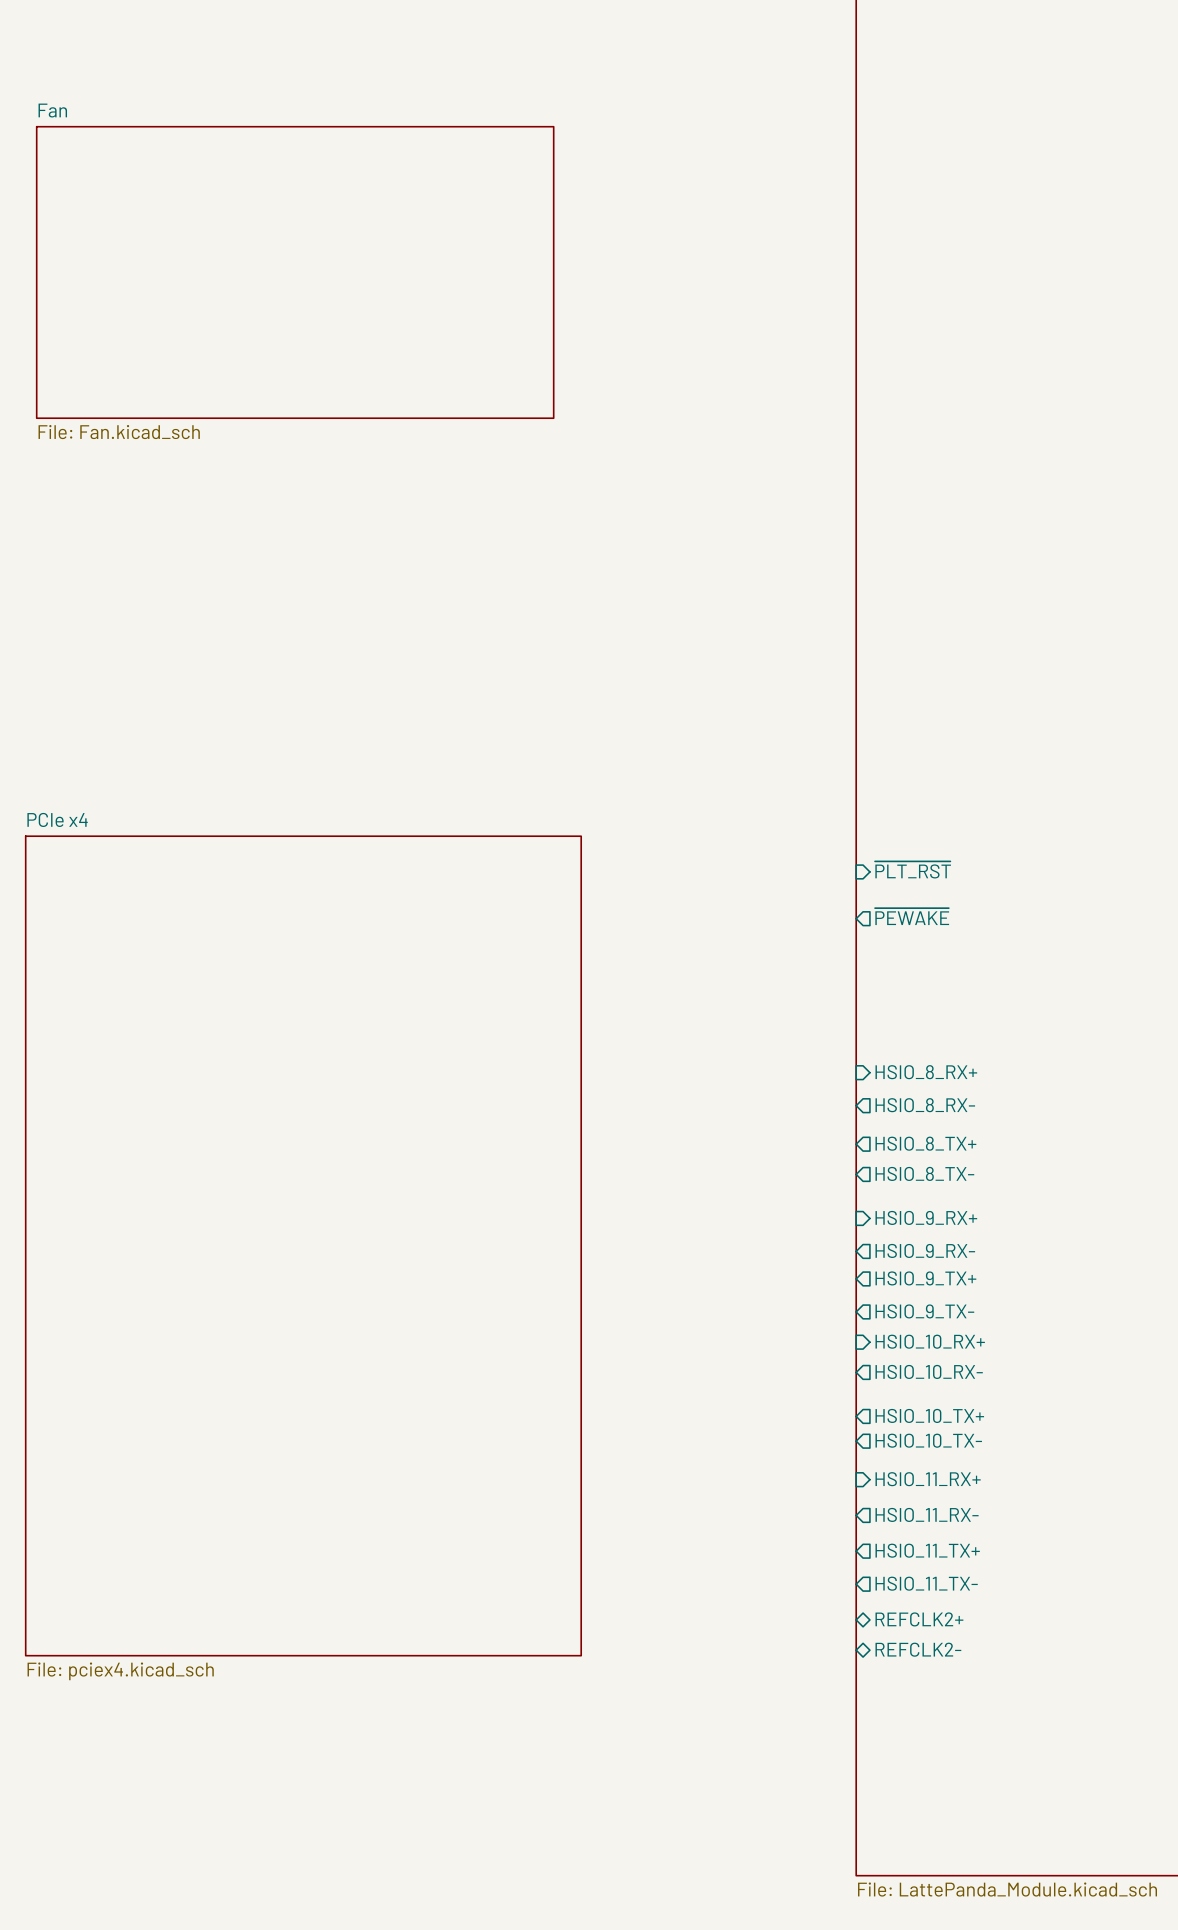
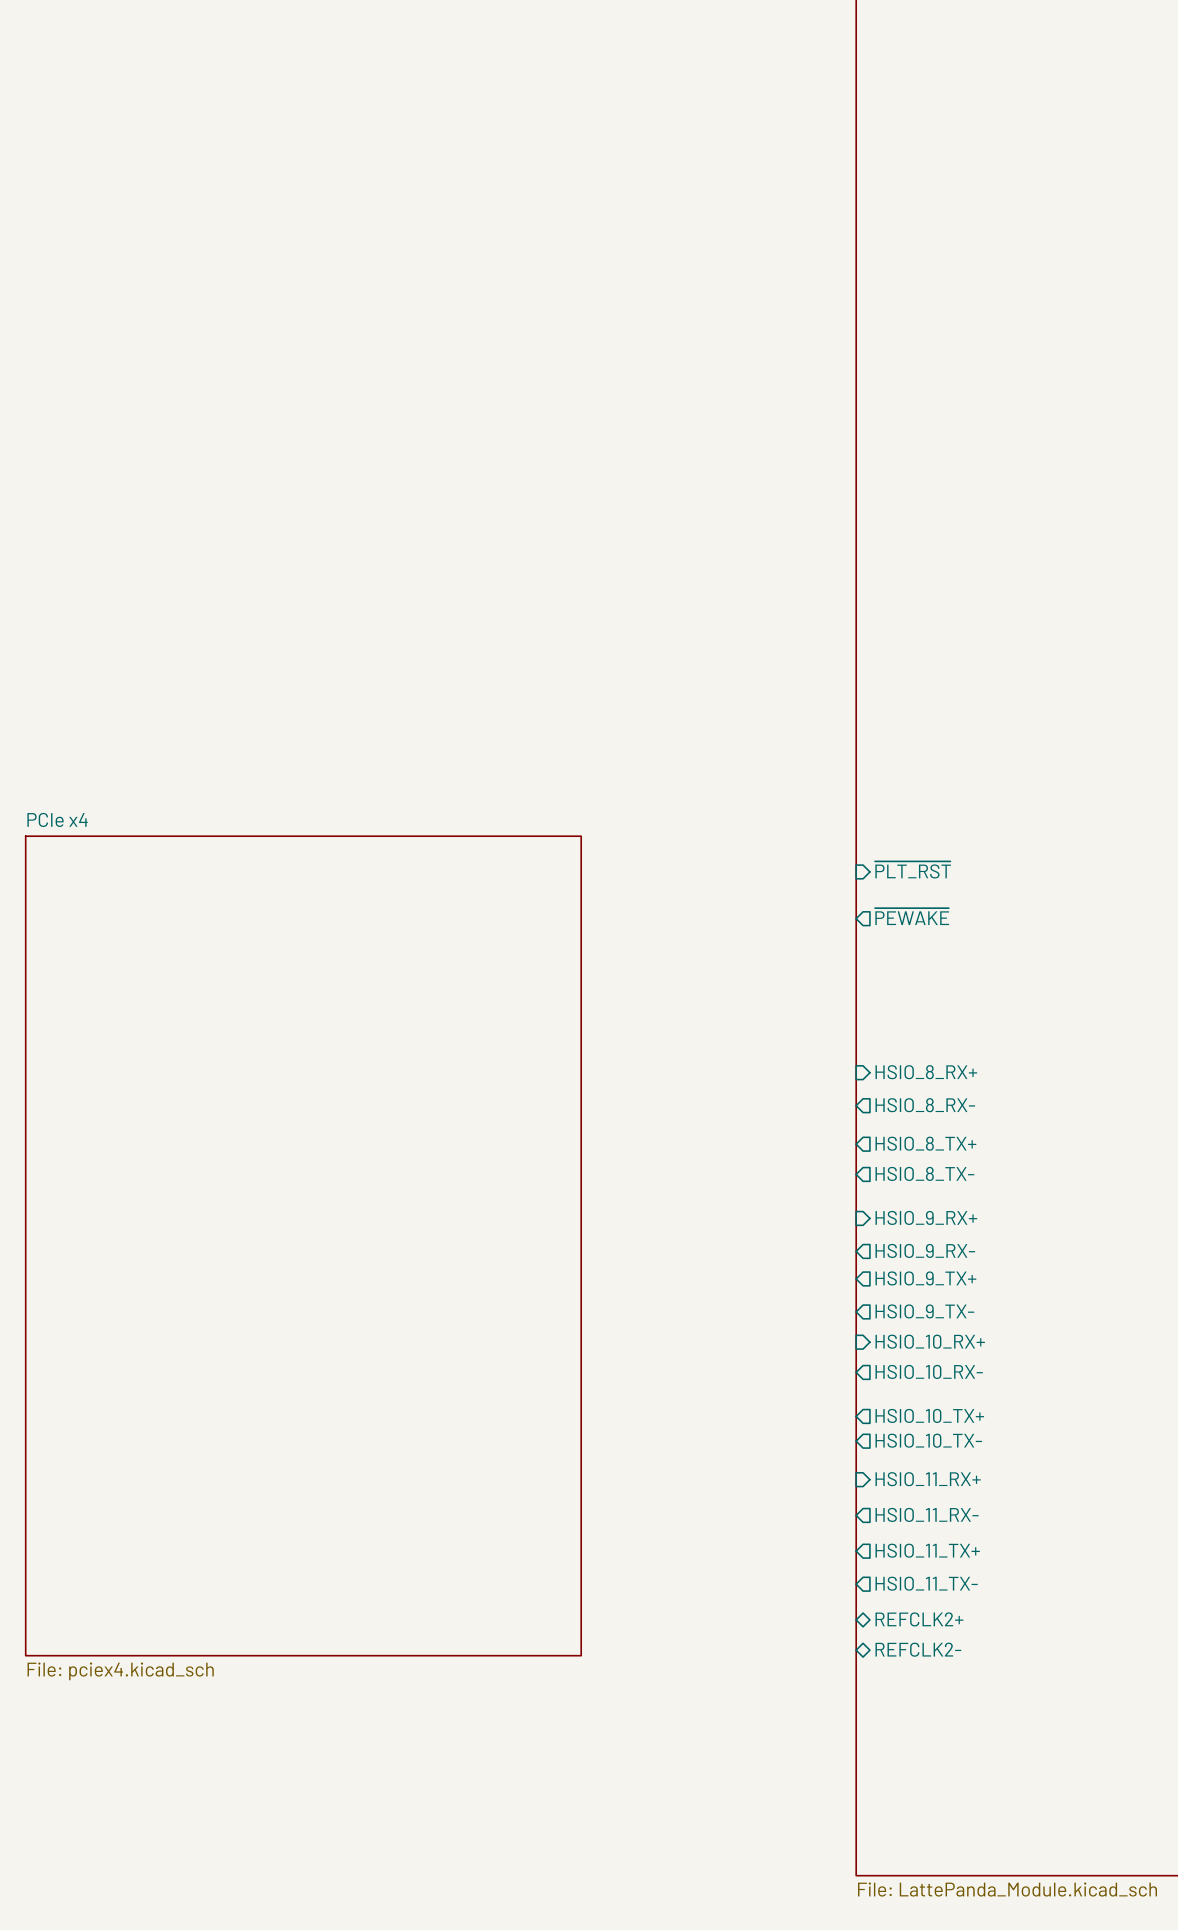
sheet Fan: File: Fan.kicad_sch (295, 272) -> none

